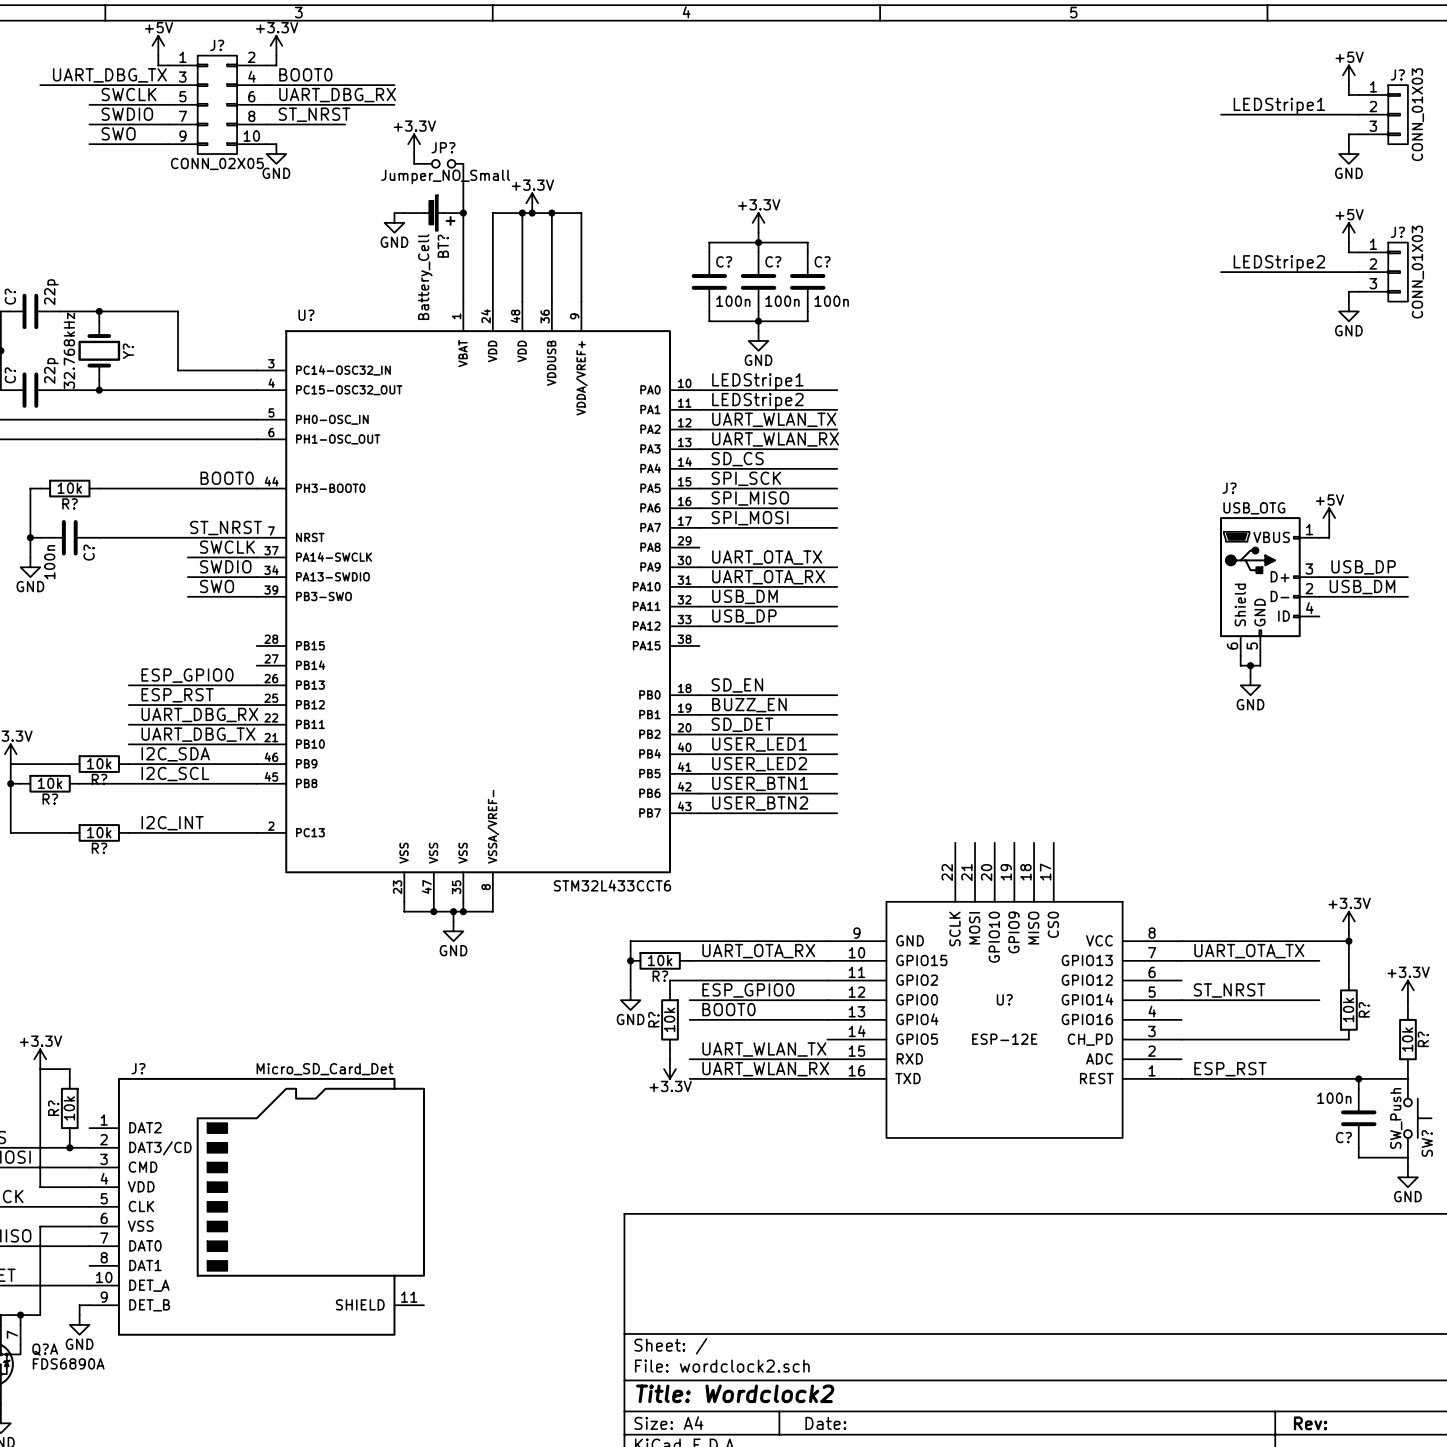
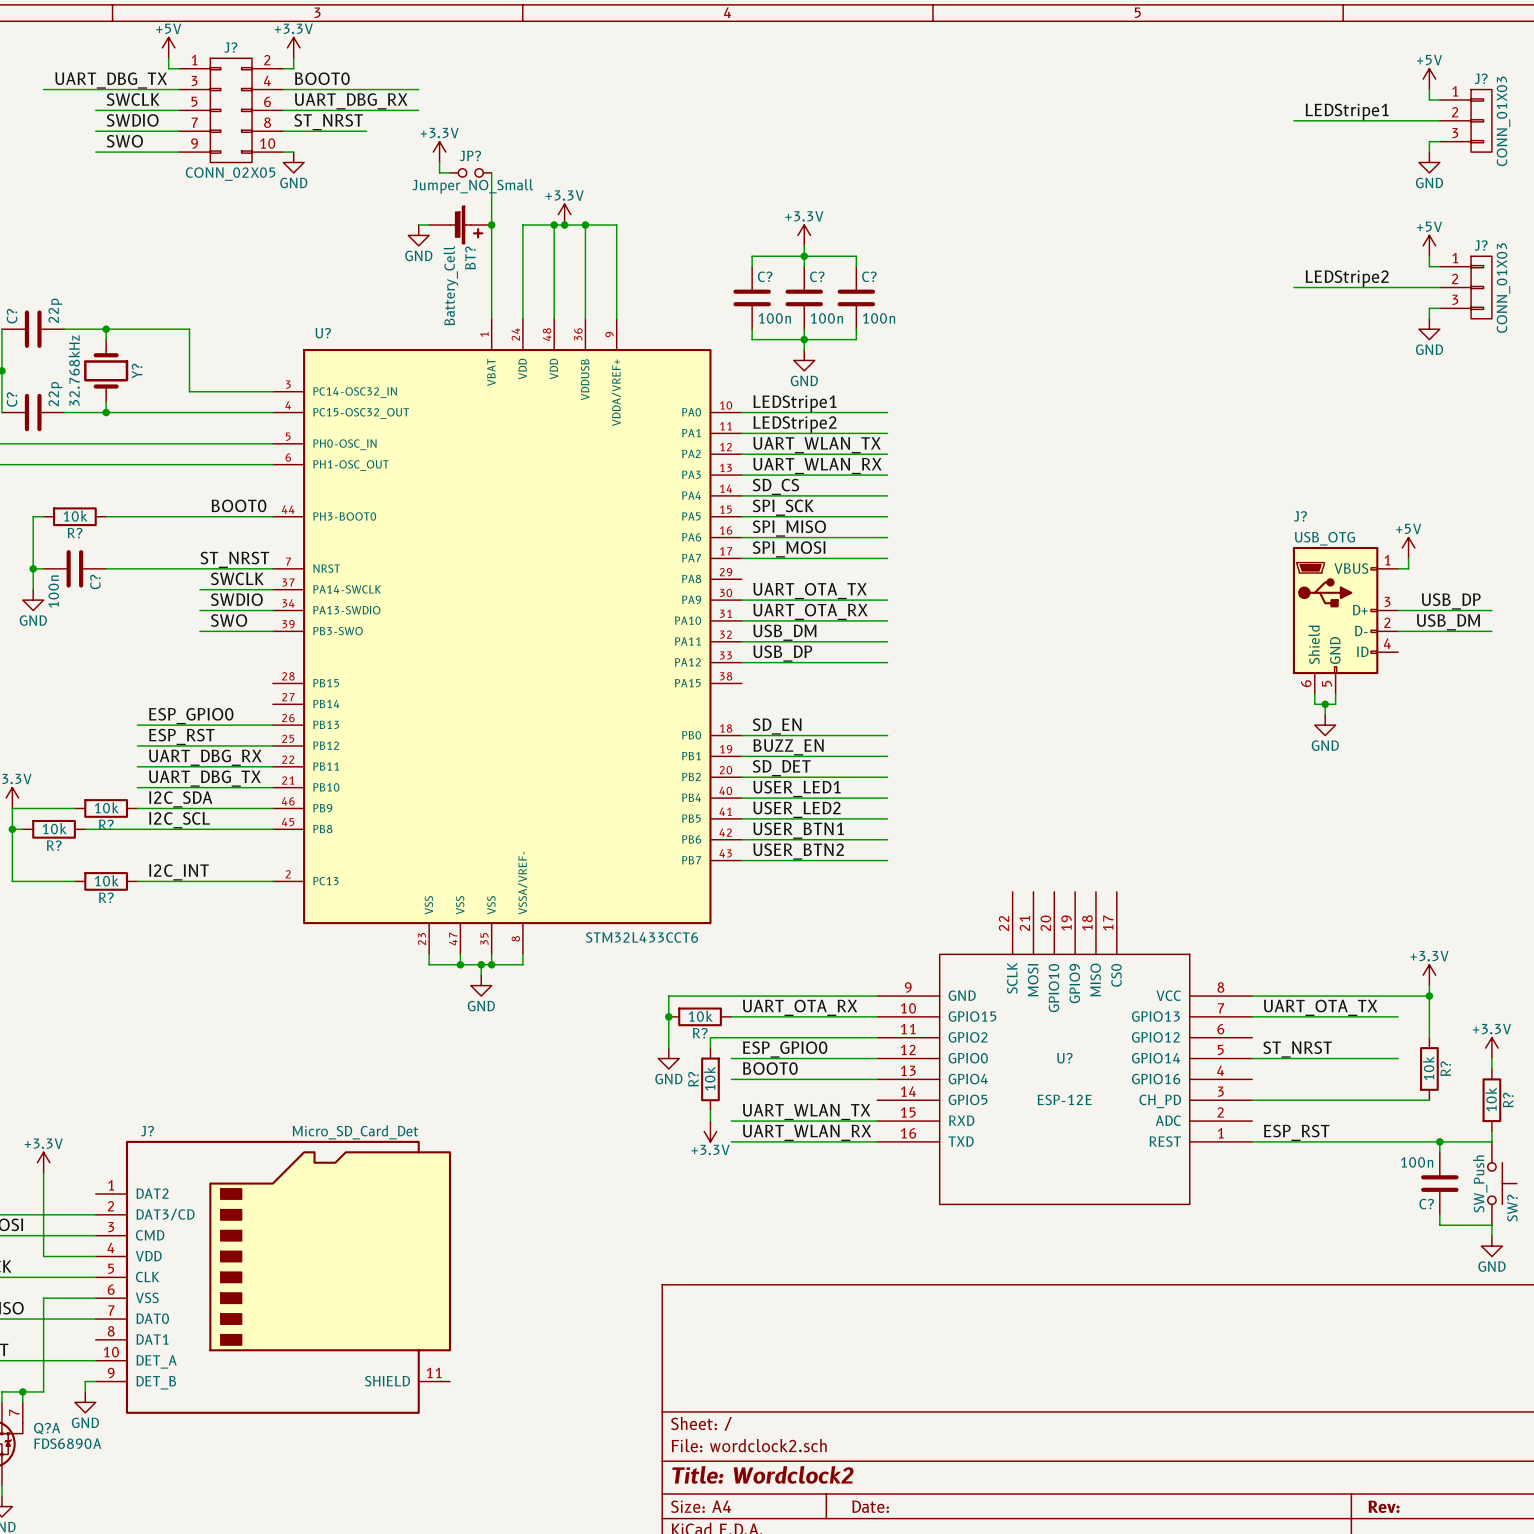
power symbol position: +3.3V (40, 1059) -> +3.3V (43, 1162)
wire: (69, 1078) (69, 1069) (40, 1069) (40, 1108) -> none
R?: 10k (69, 1108) -> none
wire: (69, 1137) (69, 1147) -> none
junction: (69, 1147) -> none

